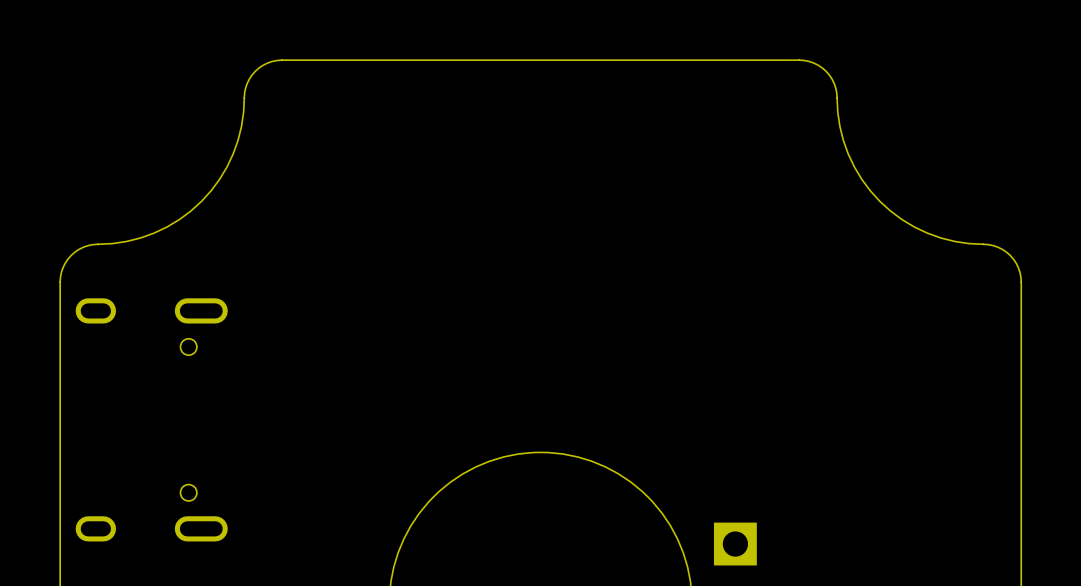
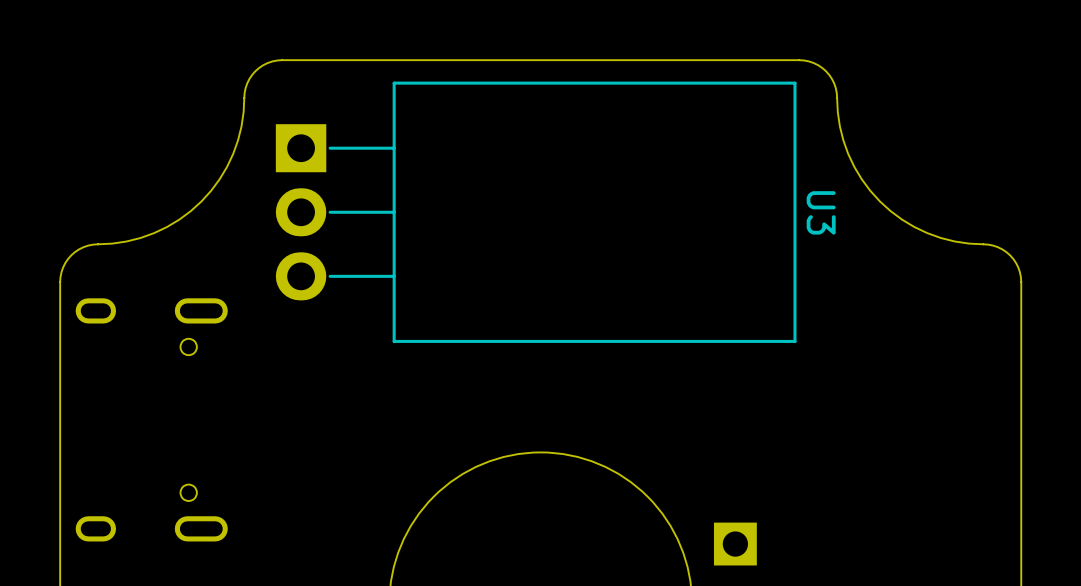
U3: none -> (536, 212)

